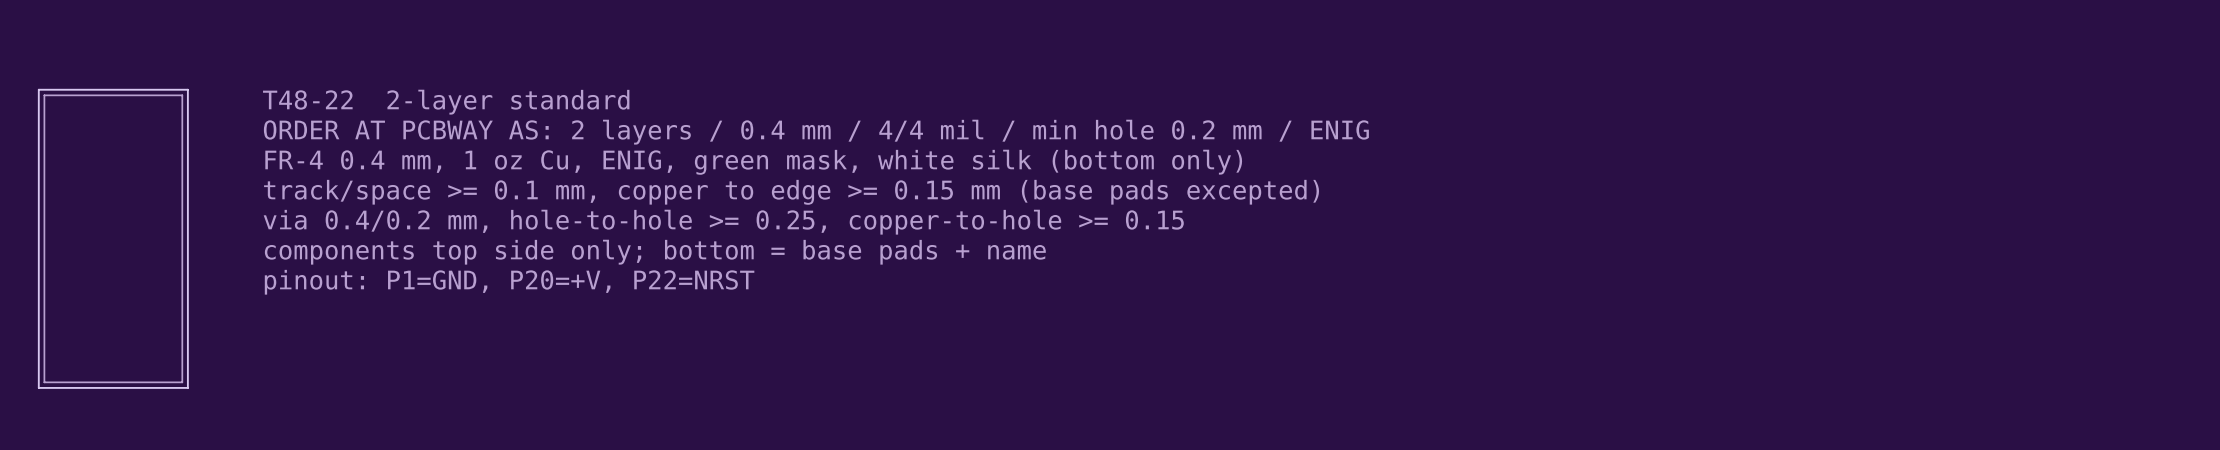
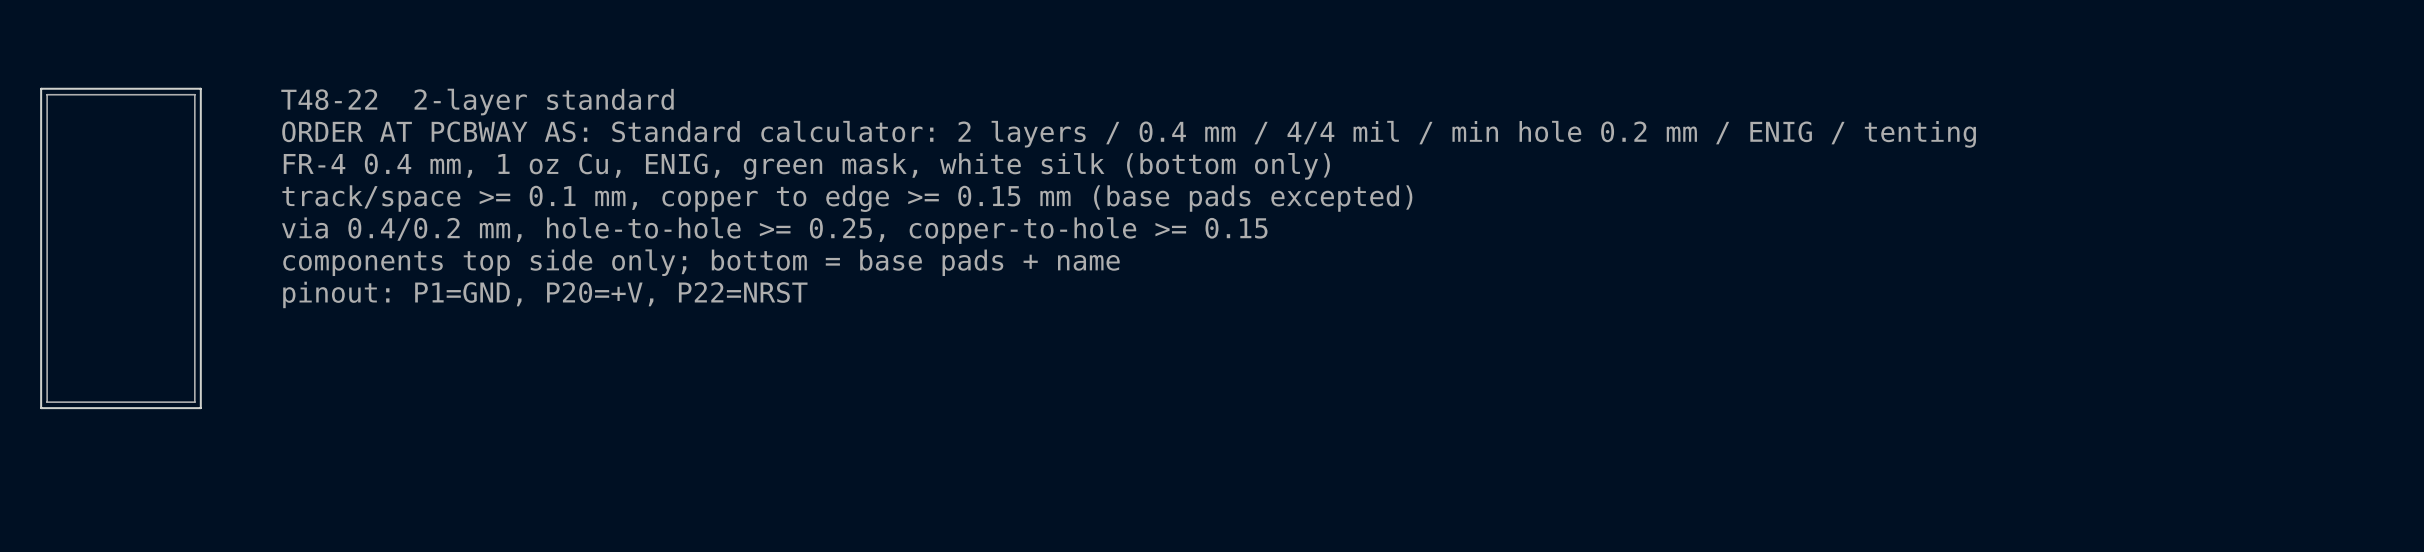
text: ORDER AT PCBWAY AS: 2 layers / 0.4 mm / 4/4 mil / min hole 0.2 mm / ENIG (816, 132) -> ORDER AT PCBWAY AS: Standard calculator: 2 layers / 0.4 mm / 4/4 mil / min hole 0.2 mm / ENIG / tenting (1129, 134)

